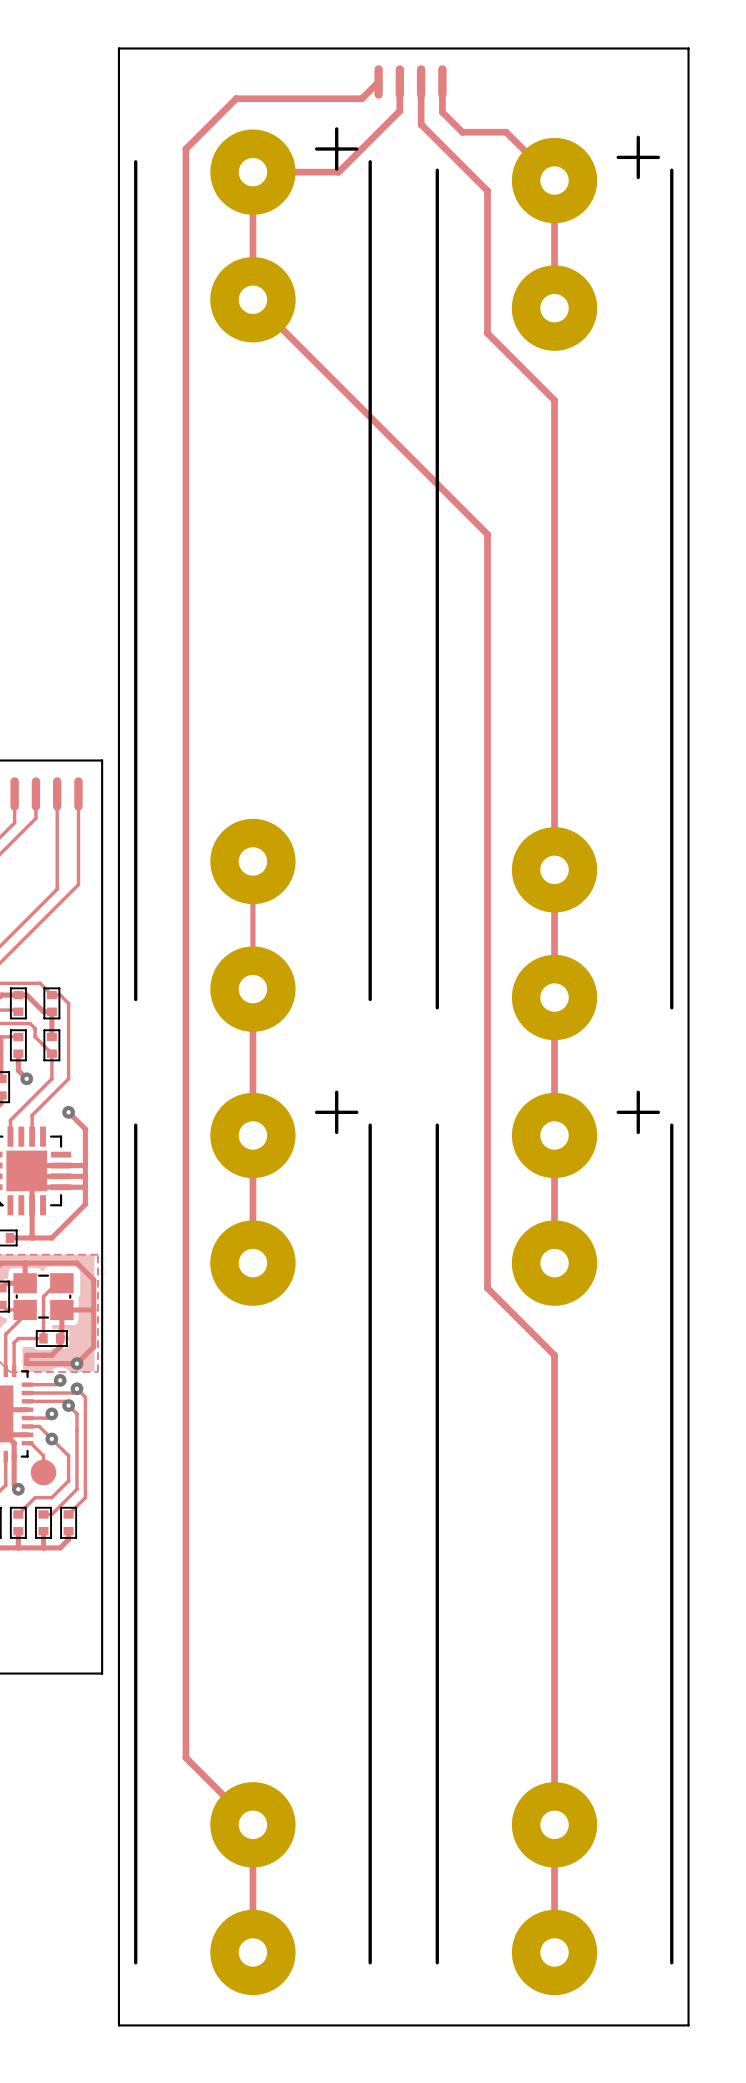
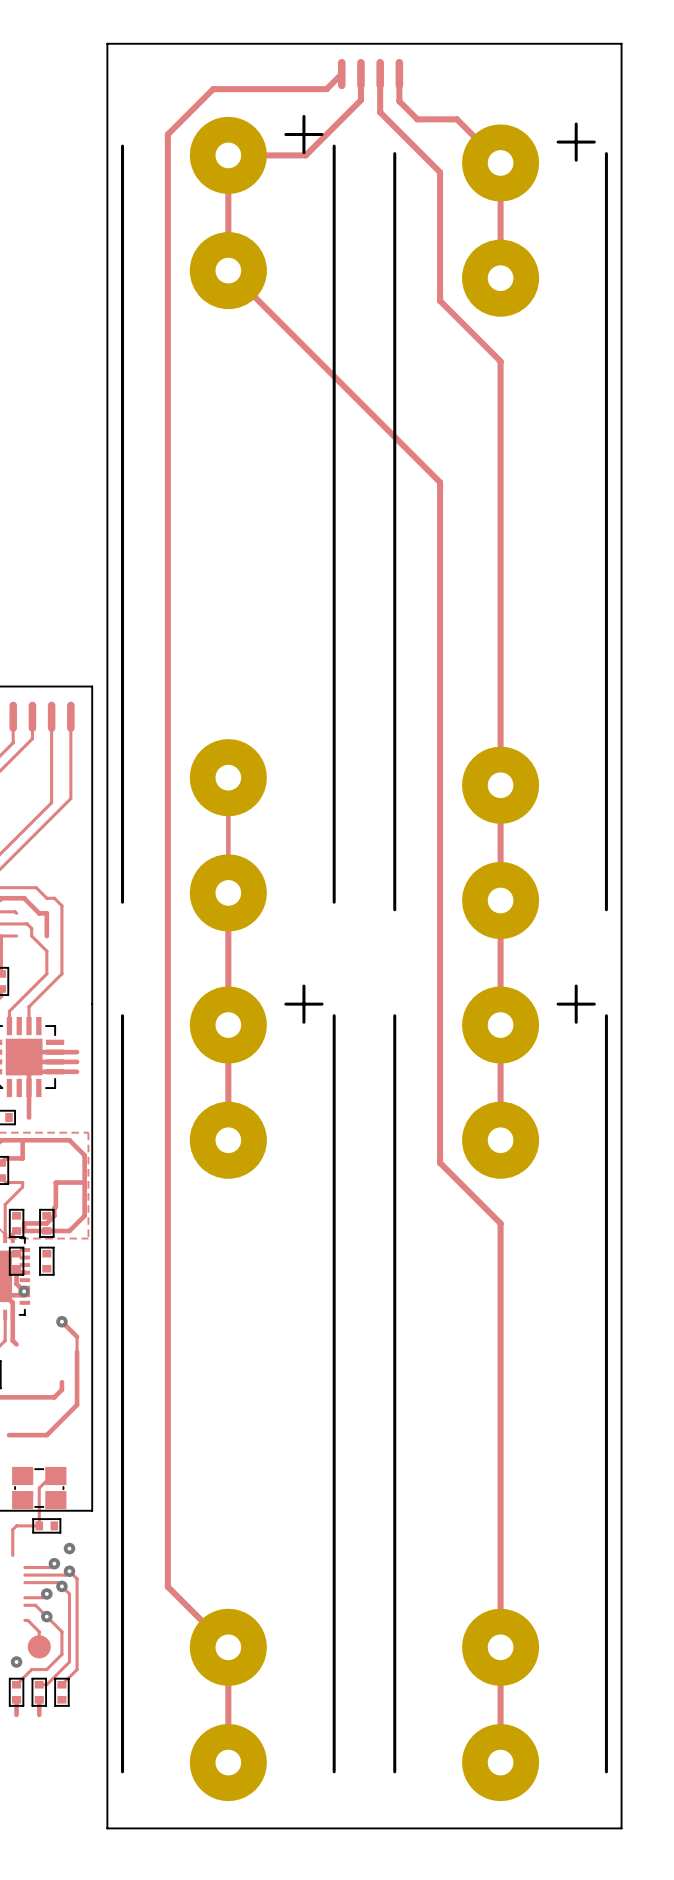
part: (18, 1003) -> none
part: (51, 1003) -> none
part: (18, 1045) -> none
part: (51, 1045) -> none
track: (18, 1053) (18, 1070) (26, 1078) -> (16, 1268) (16, 1283) (24, 1291)
via: (26, 1078) -> none
track: (68, 1112) (85, 1129) (85, 1204) (51, 1237) (9, 1237) -> none
via: (68, 1112) -> none
track: (61, 1283) (56, 1283) (43, 1296) (43, 1338) (18, 1338) (14, 1342) (14, 1371) -> (55, 1475) (51, 1475) (39, 1488) (39, 1525) (16, 1525) (12, 1529) (12, 1555)
part position: (43, 1296) -> (39, 1488)
part rotation: 0° (51, 1338) -> 90° clockwise (46, 1223)
part: none -> (16, 1223)
via: (76, 1363) -> none
track: (60, 1380) (55, 1384) (27, 1384) -> (54, 1563) (50, 1567) (24, 1567)
via: (60, 1380) -> none
via: (76, 1388) -> none
track: (27, 1393) (72, 1393) (76, 1388) (85, 1397) (85, 1480) -> (61, 1321) (77, 1336)
part: none -> (16, 1261)
part: none -> (46, 1261)
track: (27, 1401) (64, 1401) (76, 1413) (76, 1489) (51, 1514) (43, 1514) -> (24, 1582) (58, 1582) (69, 1593) (69, 1662) (46, 1684) (39, 1684)
via: (68, 1405) -> none
track: (51, 1413) (47, 1418) (27, 1418) -> (46, 1593) (43, 1597) (24, 1597)
via: (51, 1413) -> none
track: (27, 1426) (39, 1426) (68, 1455) (68, 1480) (51, 1497) (35, 1497) (18, 1514) -> (24, 1605) (35, 1605) (61, 1631) (61, 1654) (46, 1669) (31, 1669) (16, 1684)
via: none -> (24, 1291)
via: (51, 1439) -> none
track: (27, 1443) (30, 1443) (43, 1455) (43, 1472) -> (24, 1620) (27, 1620) (39, 1631) (39, 1646)
via: none -> (61, 1321)
part: (43, 1472) -> none
via: (18, 1489) -> none
track: (85, 1497) (68, 1514) -> (77, 1352) (77, 1404) (46, 1435) (8, 1435)
part: (18, 1522) -> none
part: (43, 1522) -> none
part: (68, 1522) -> none
track: (18, 1531) (18, 1547) -> (16, 1699) (16, 1714)
track: (43, 1531) (43, 1547) -> (39, 1699) (39, 1714)
part: none -> (46, 1525)
via: none -> (69, 1548)
via: none -> (54, 1563)
via: none -> (69, 1571)
track: none -> (24, 1575) (65, 1575) (69, 1571) (77, 1578) (77, 1669) (61, 1684)
via: none -> (61, 1586)
via: none -> (46, 1593)
via: none -> (46, 1616)
part: none -> (39, 1646)
via: none -> (16, 1662)
part: none -> (16, 1692)
part: none -> (39, 1692)
part: none -> (61, 1692)

